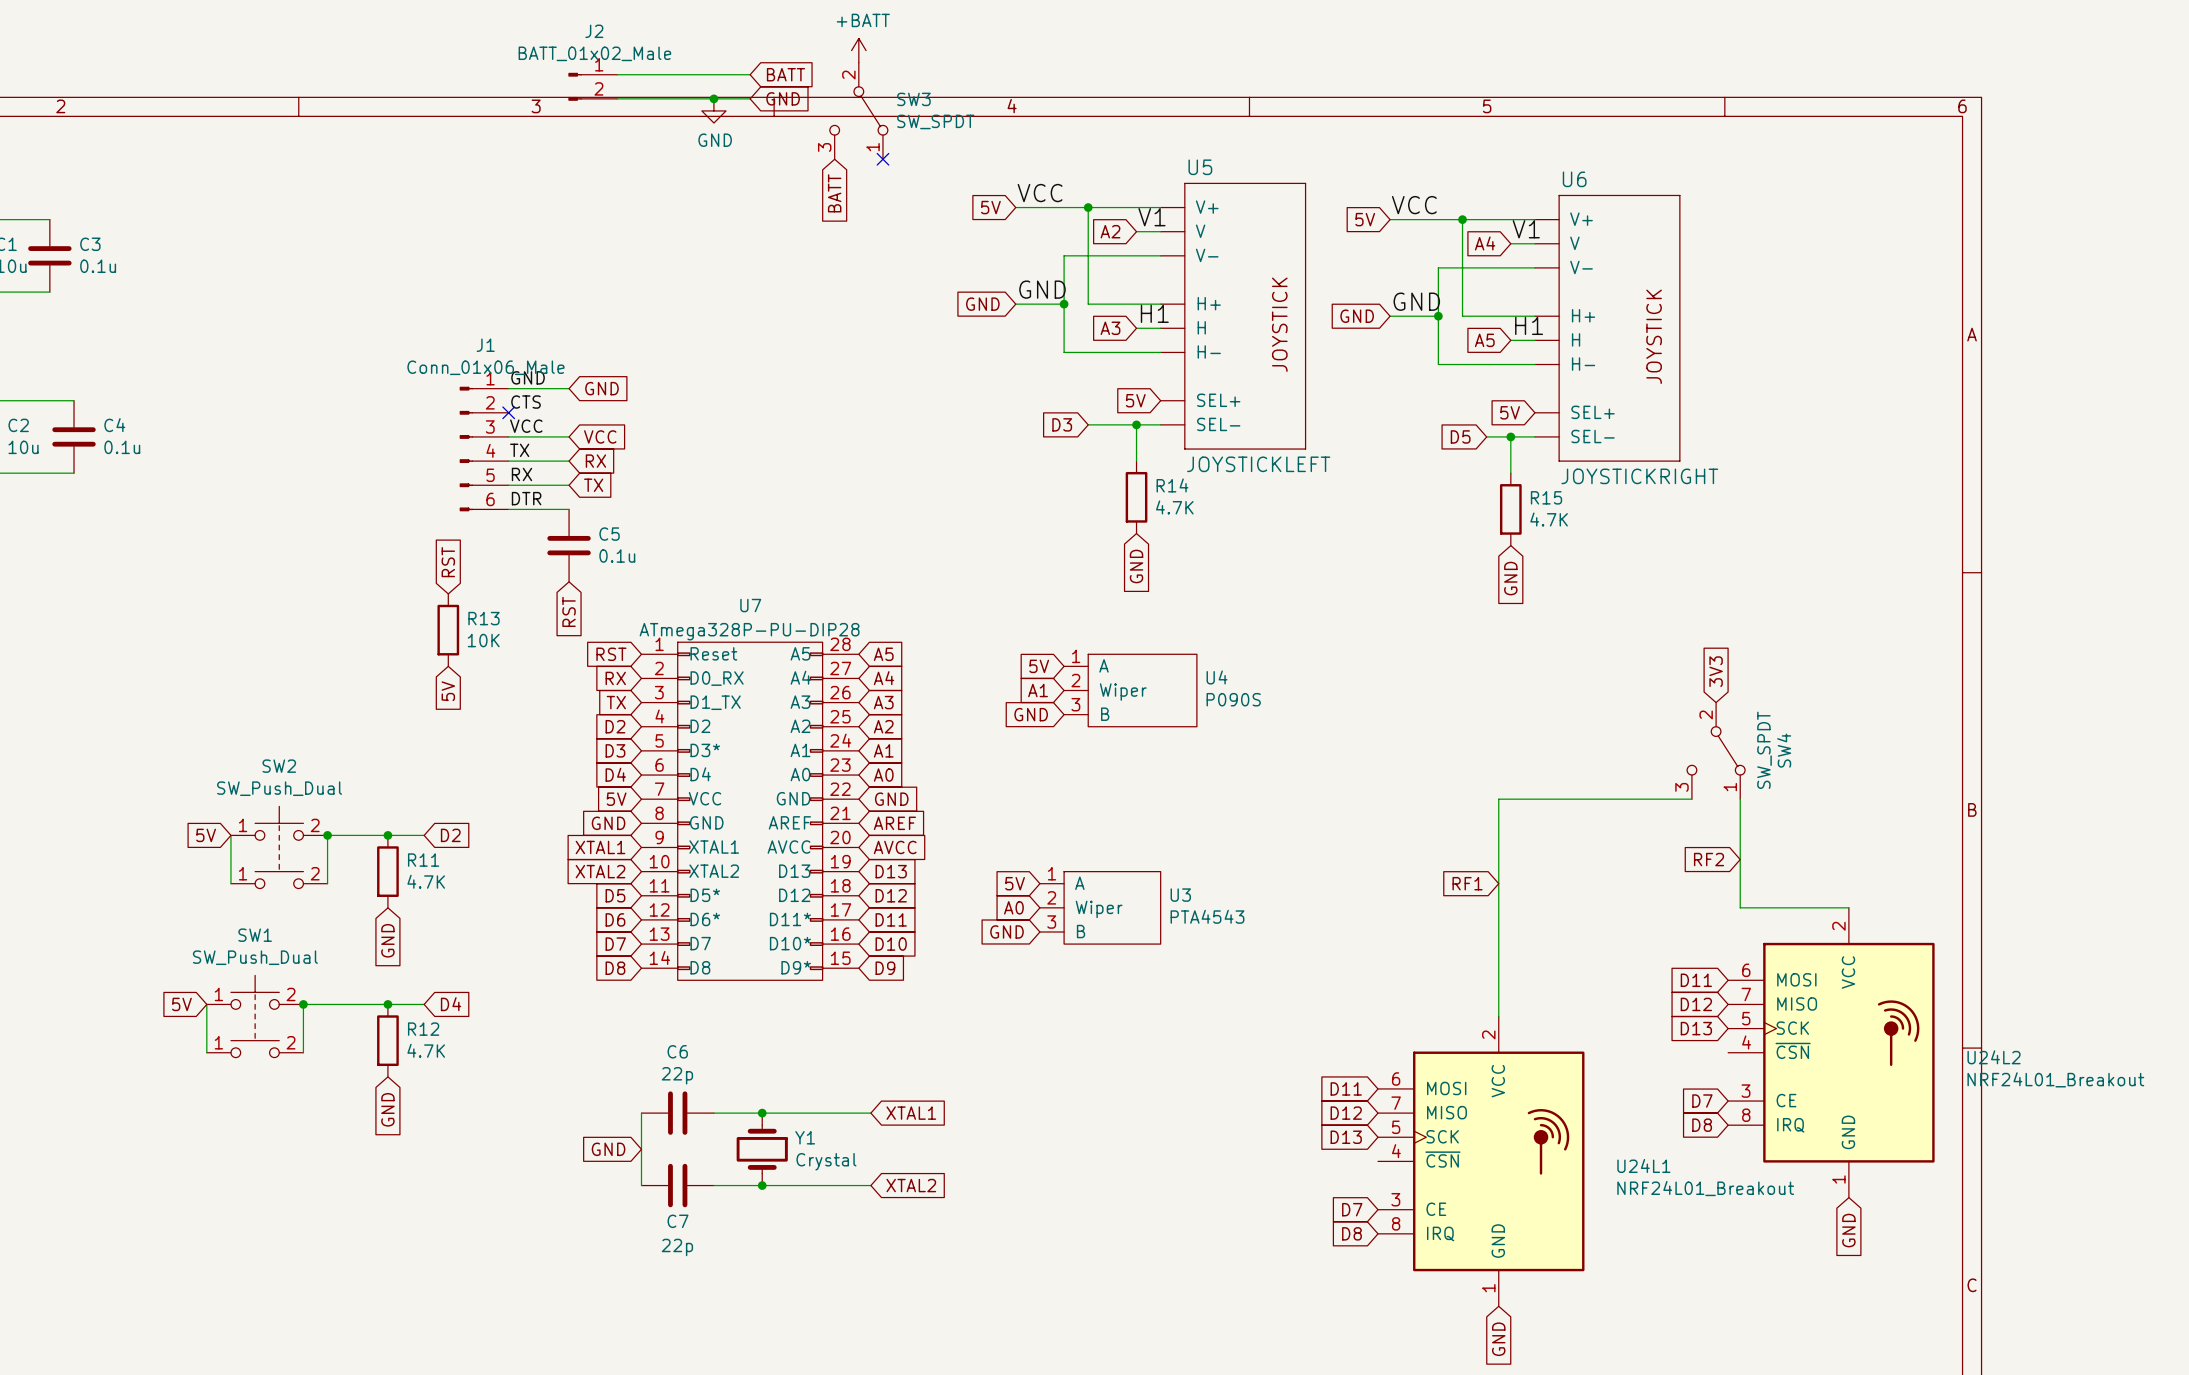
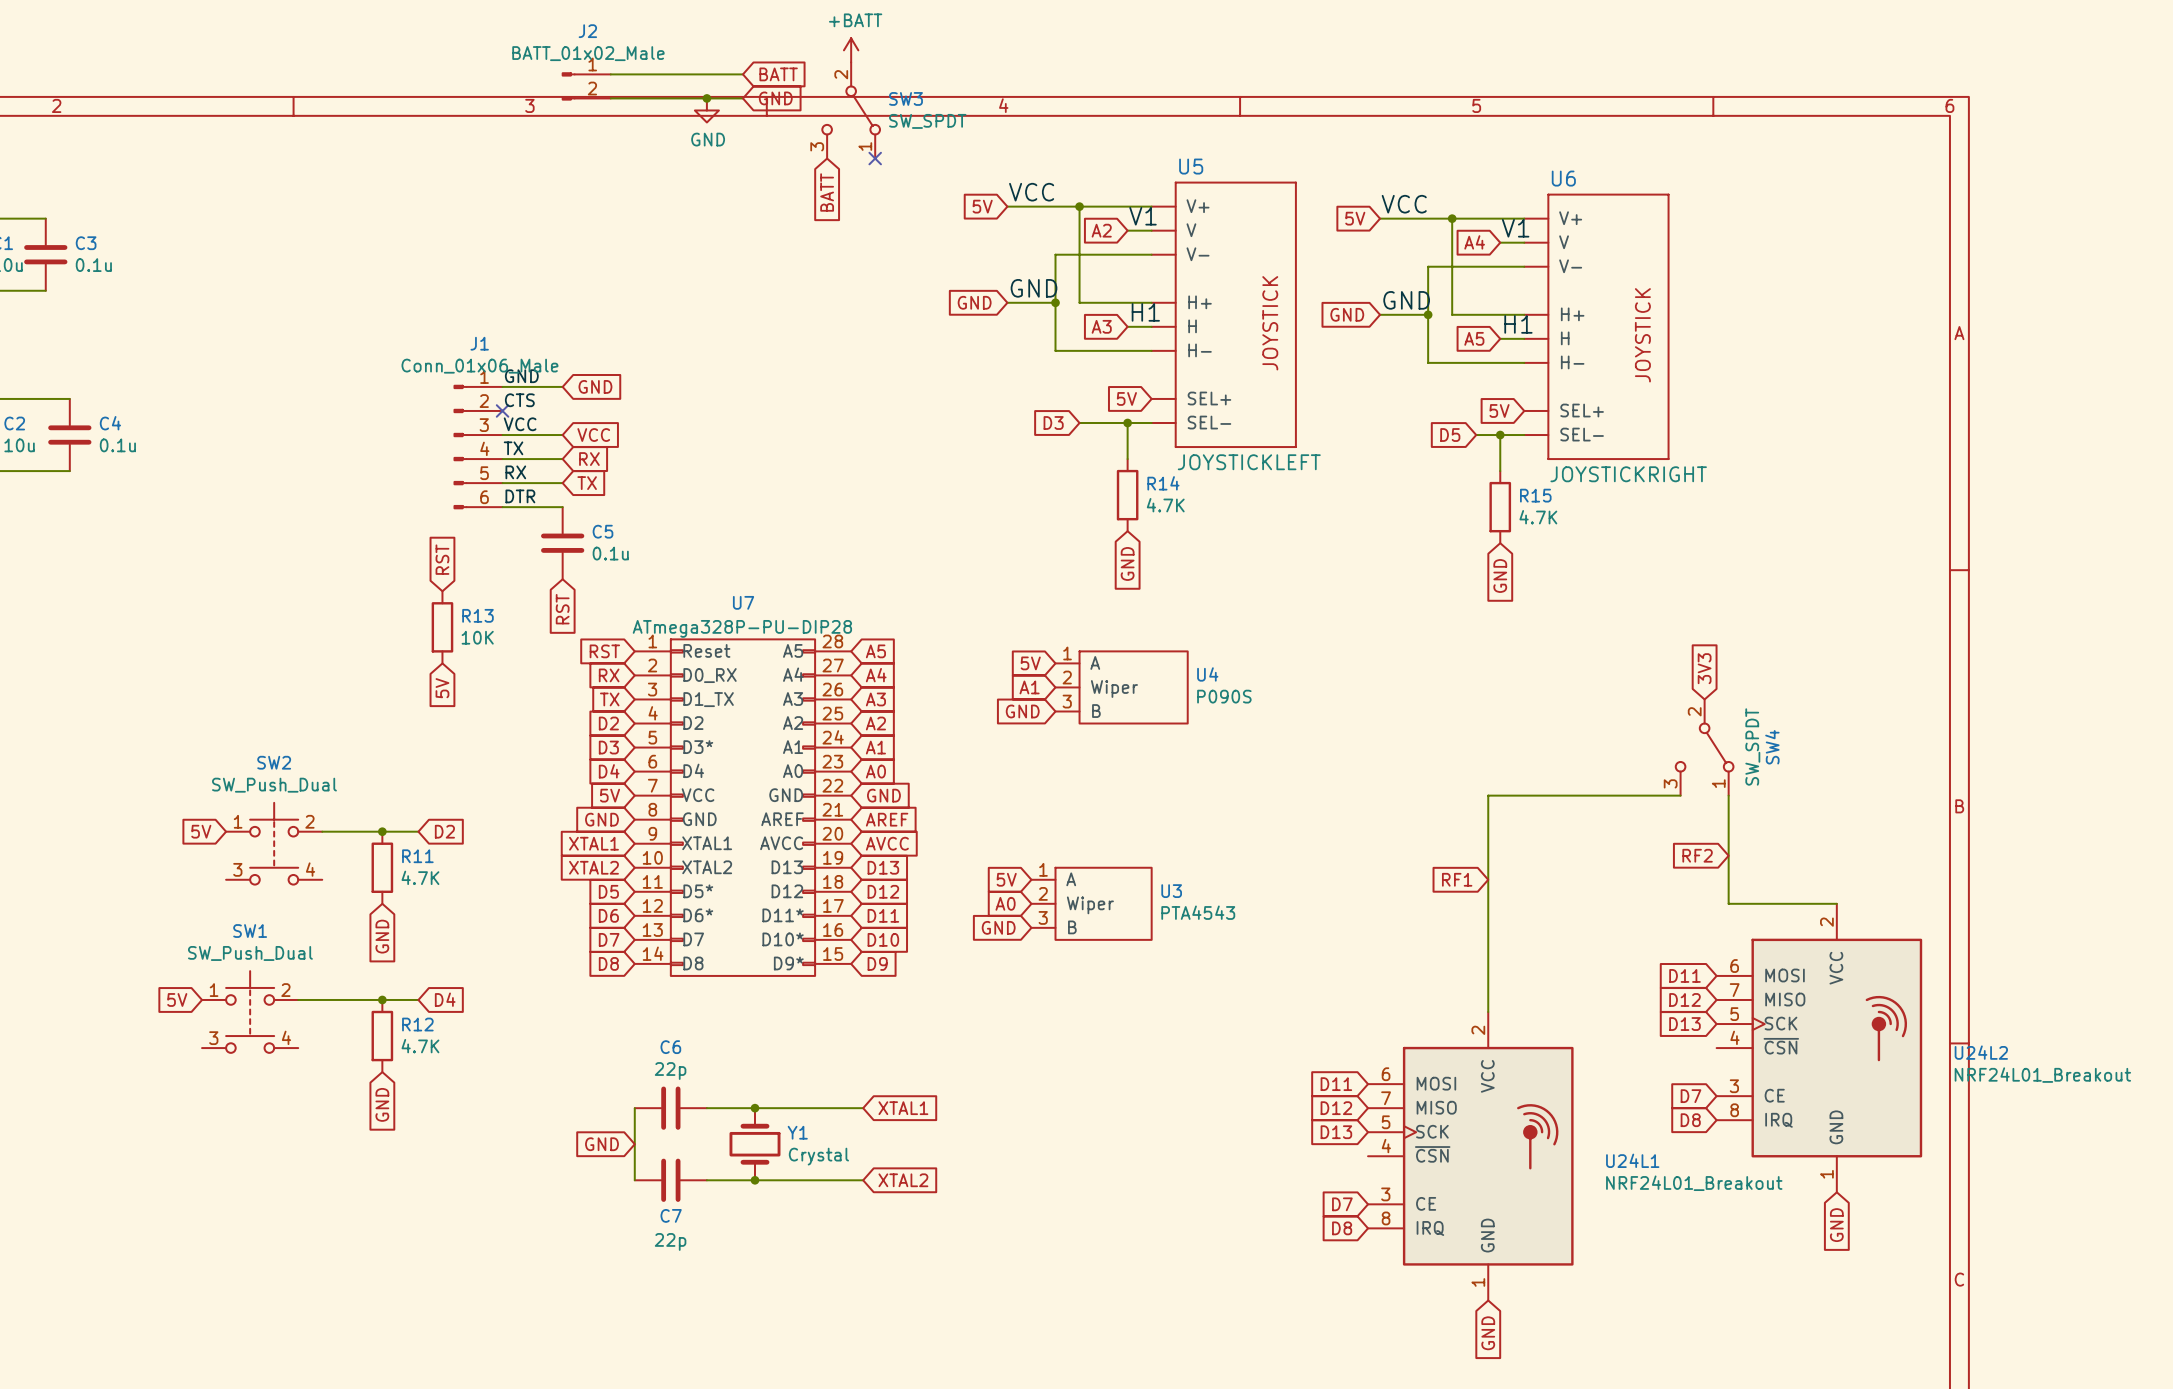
wire: (230, 835) (230, 883) -> none
wire: (327, 835) (327, 883) -> none
junction: (327, 835) -> none
SW2 pin number: 1 (243, 873) -> 3 (237, 869)
SW2 pin number: 2 (315, 873) -> 4 (310, 869)
wire: (206, 1004) (206, 1052) -> none
wire: (303, 1004) (303, 1052) -> none
junction: (303, 1004) -> none
SW1 pin number: 1 (218, 1042) -> 3 (213, 1038)
SW1 pin number: 2 (291, 1042) -> 4 (286, 1037)

